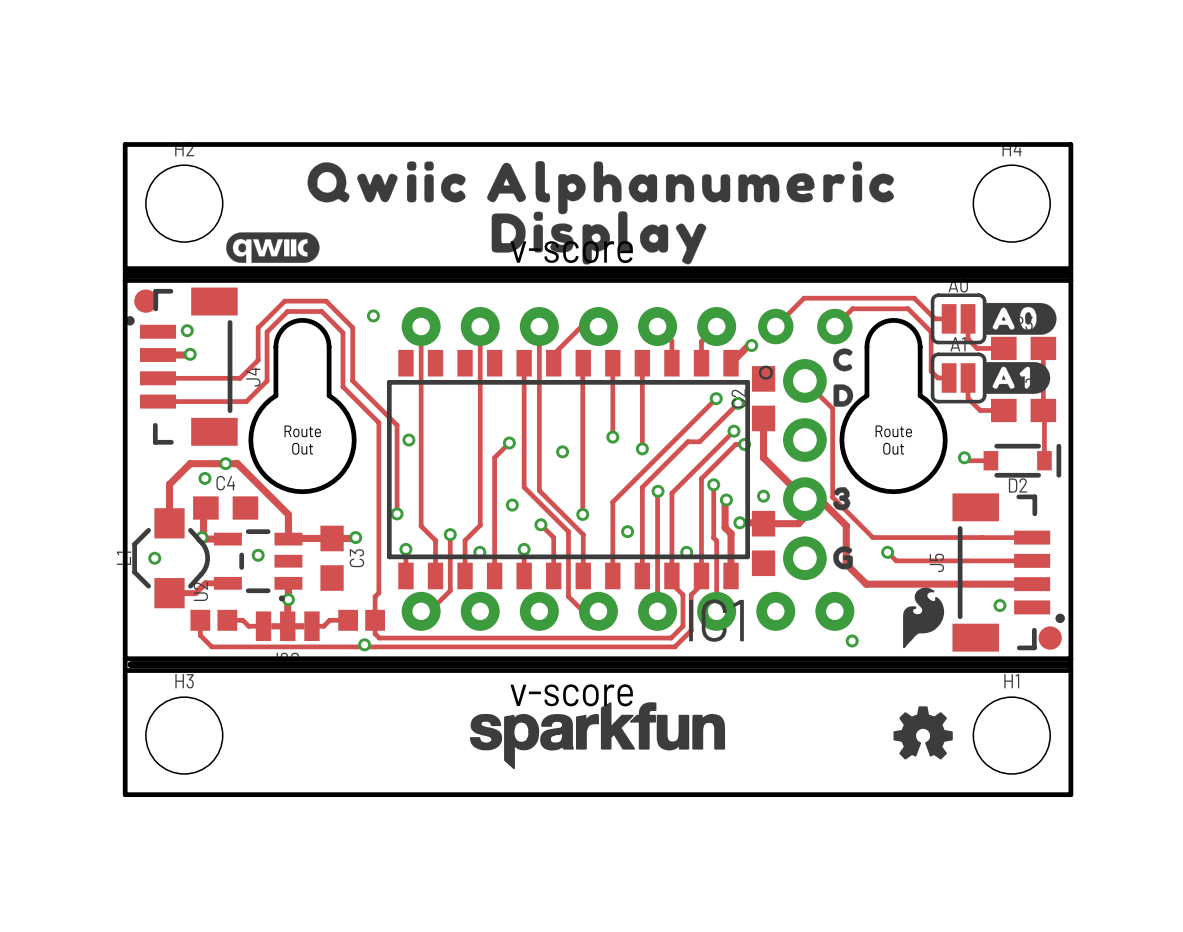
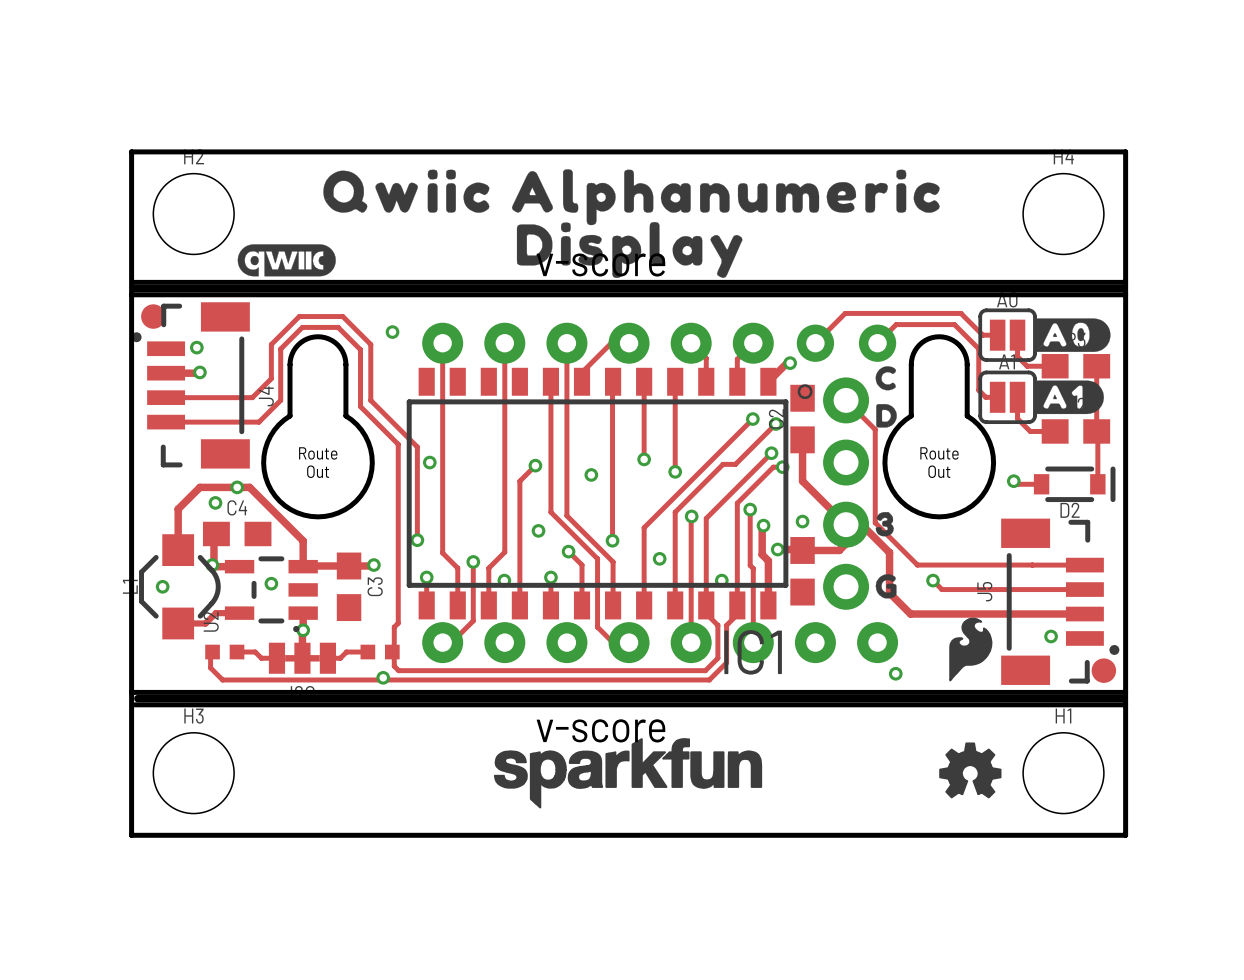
part footprint: [190, 609, 238, 631] -> [205, 644, 245, 660]
part footprint: [338, 609, 386, 631] -> [360, 644, 400, 660]

